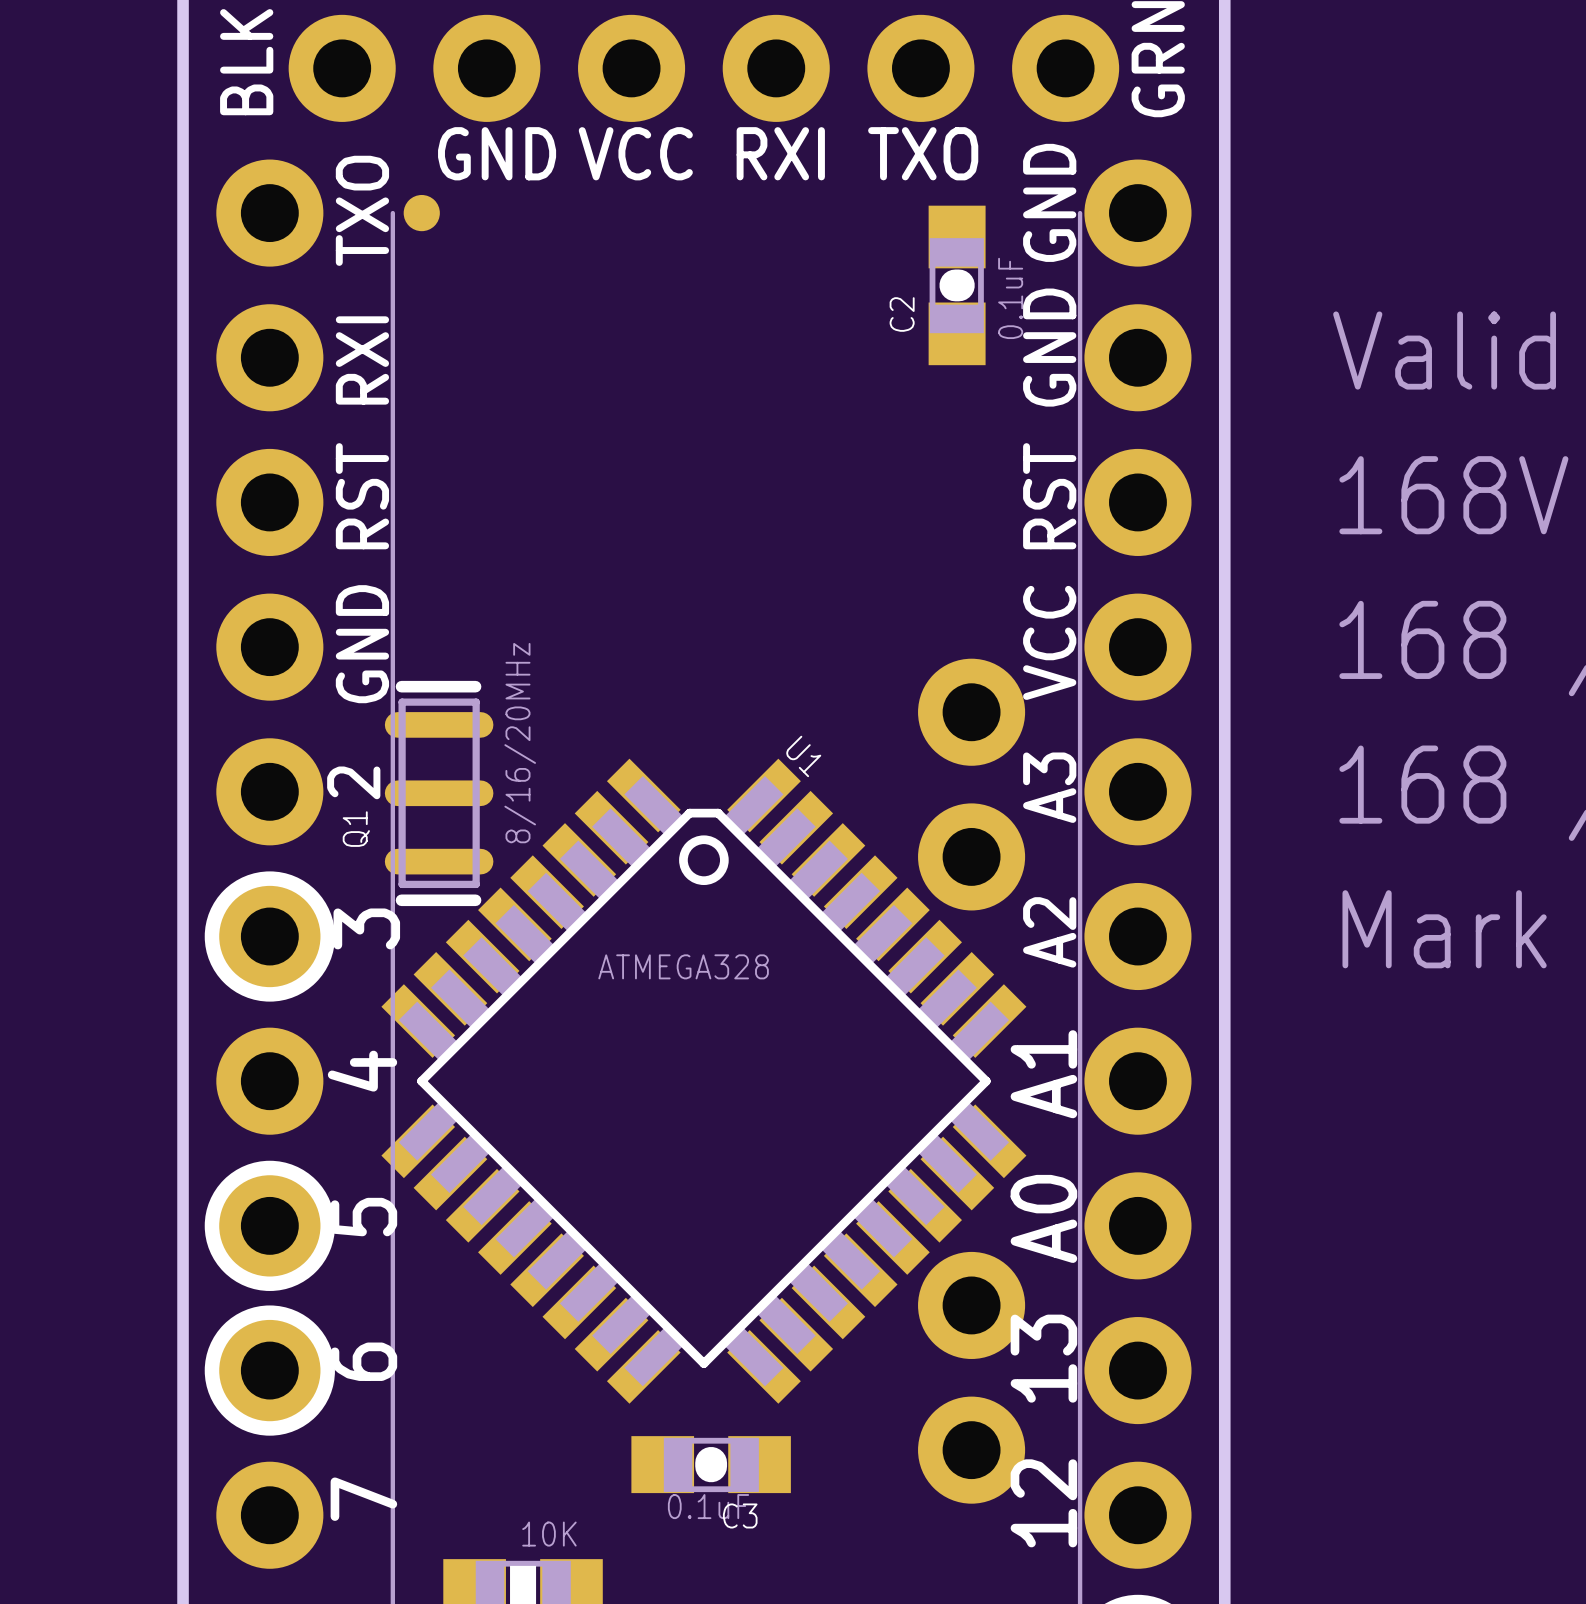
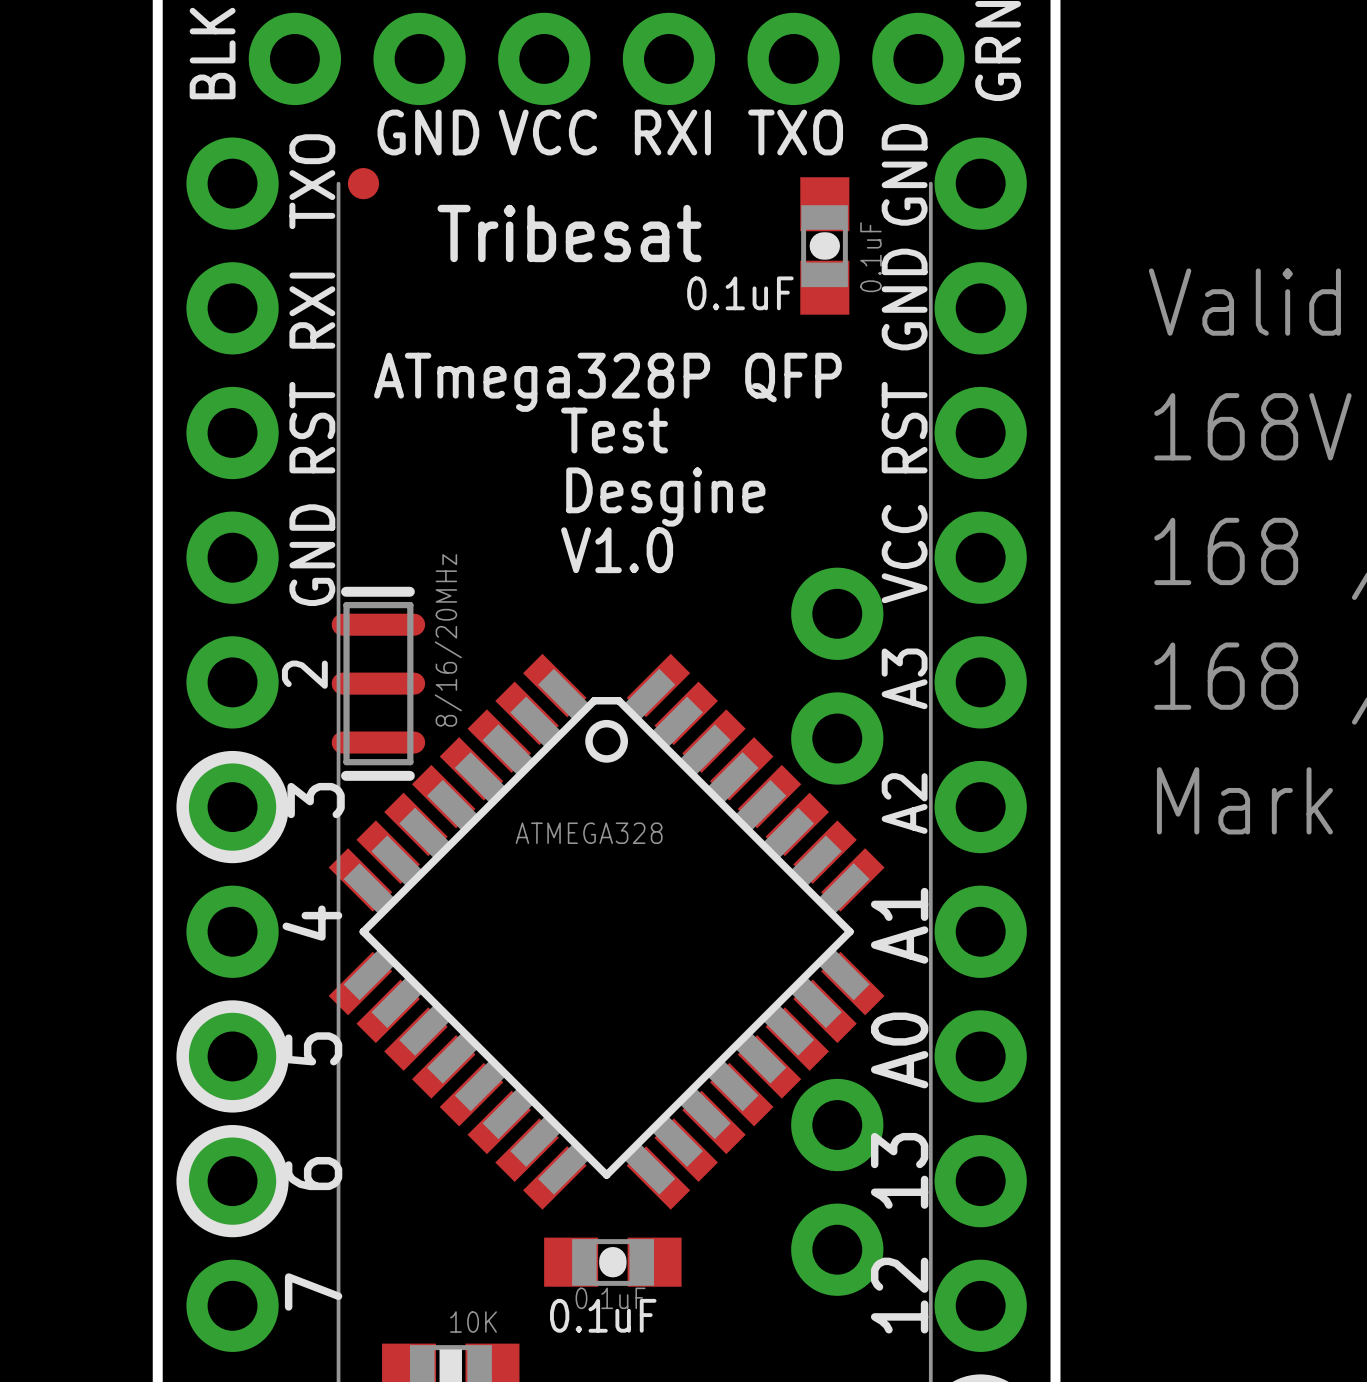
text: none -> Tribesat (569, 233)
C2 name: C2 (902, 314) -> none
text: none -> 0.1uF (740, 293)
text: none -> ATmega328P QFP (607, 382)
text: none -> Test (614, 430)
text: none -> Desgine (665, 497)
text: none -> V1.0 (617, 550)
U1 name: U1 (803, 756) -> none
Q1 name: Q1 (356, 829) -> none
C3 name: C3 (740, 1515) -> none
text: none -> 0.1uF (603, 1315)

